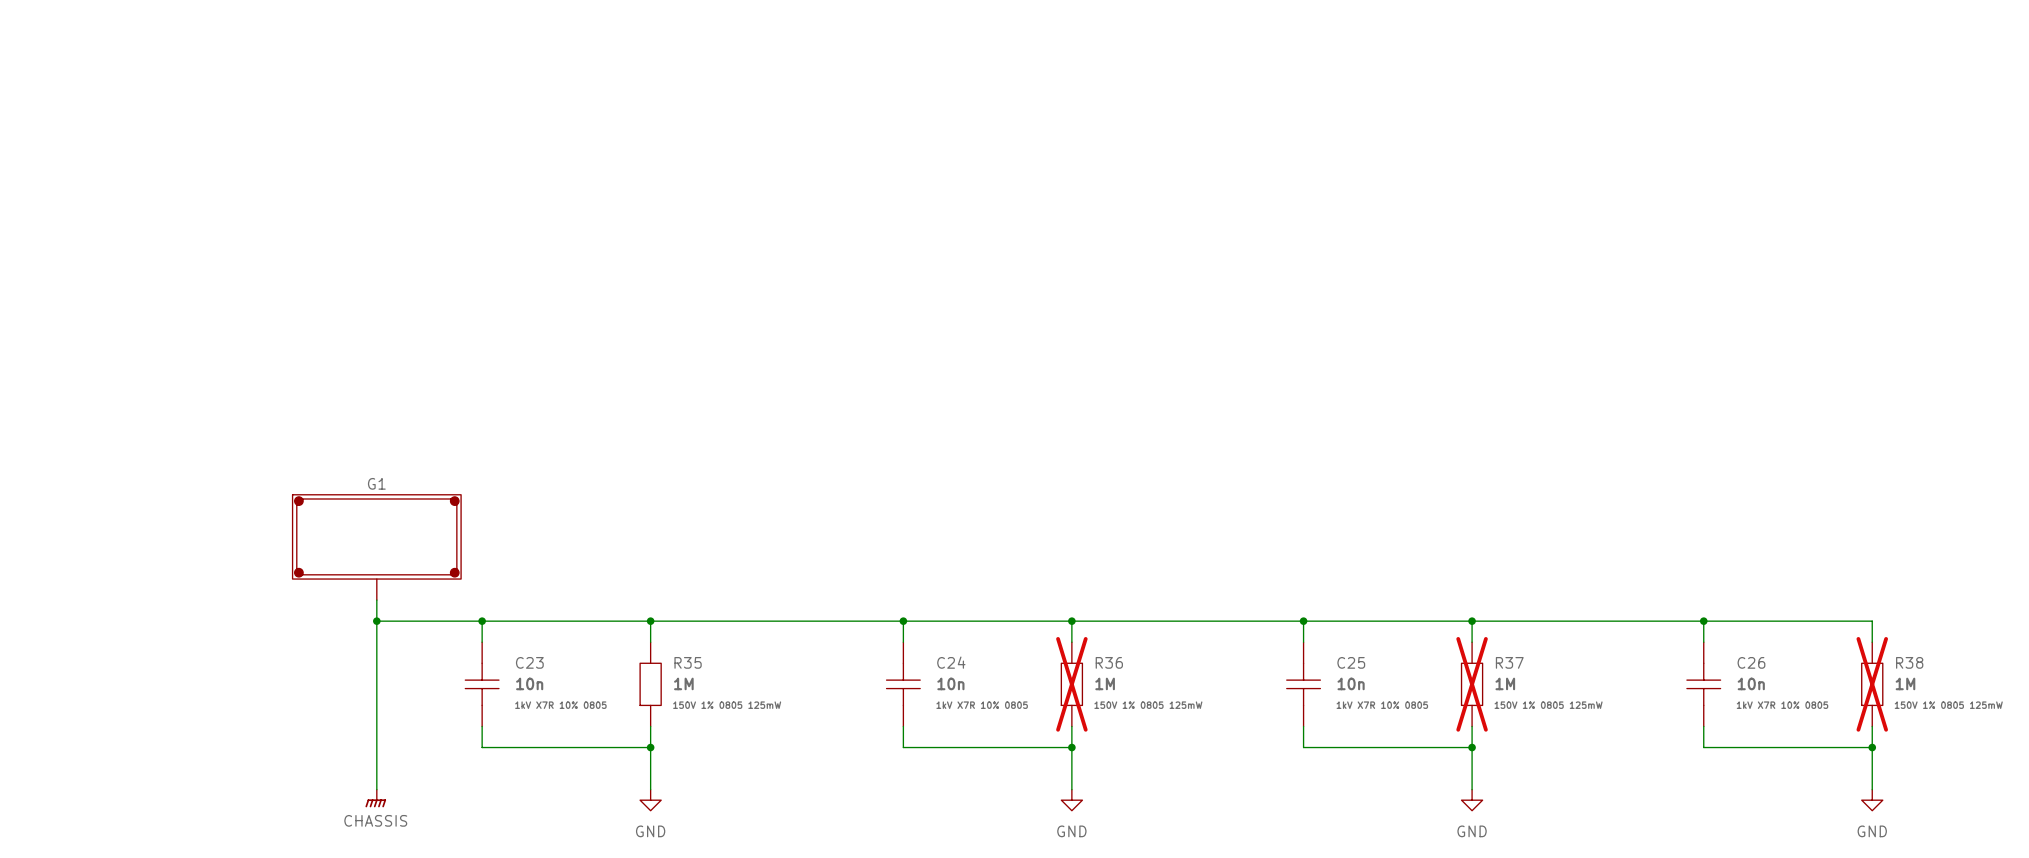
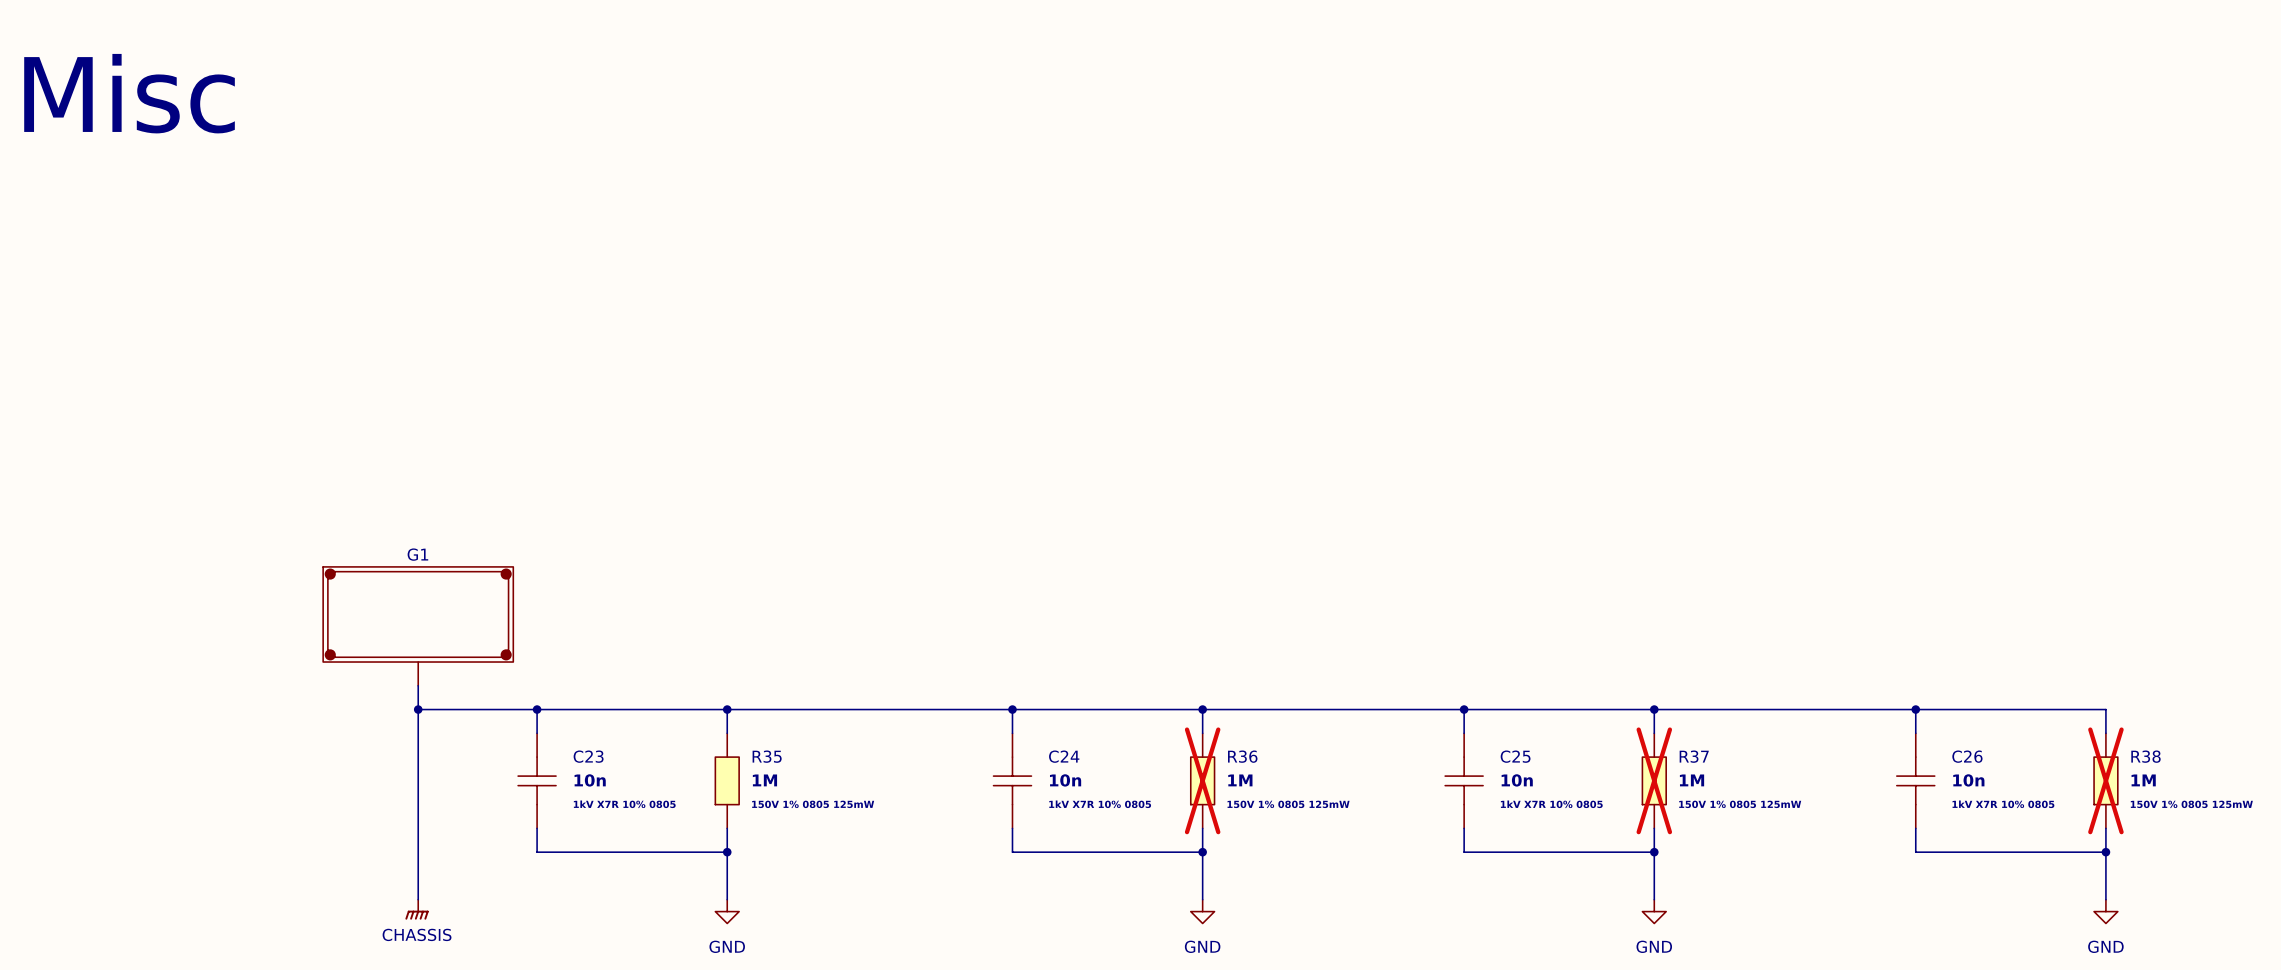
text: none -> Misc (129, 93)

